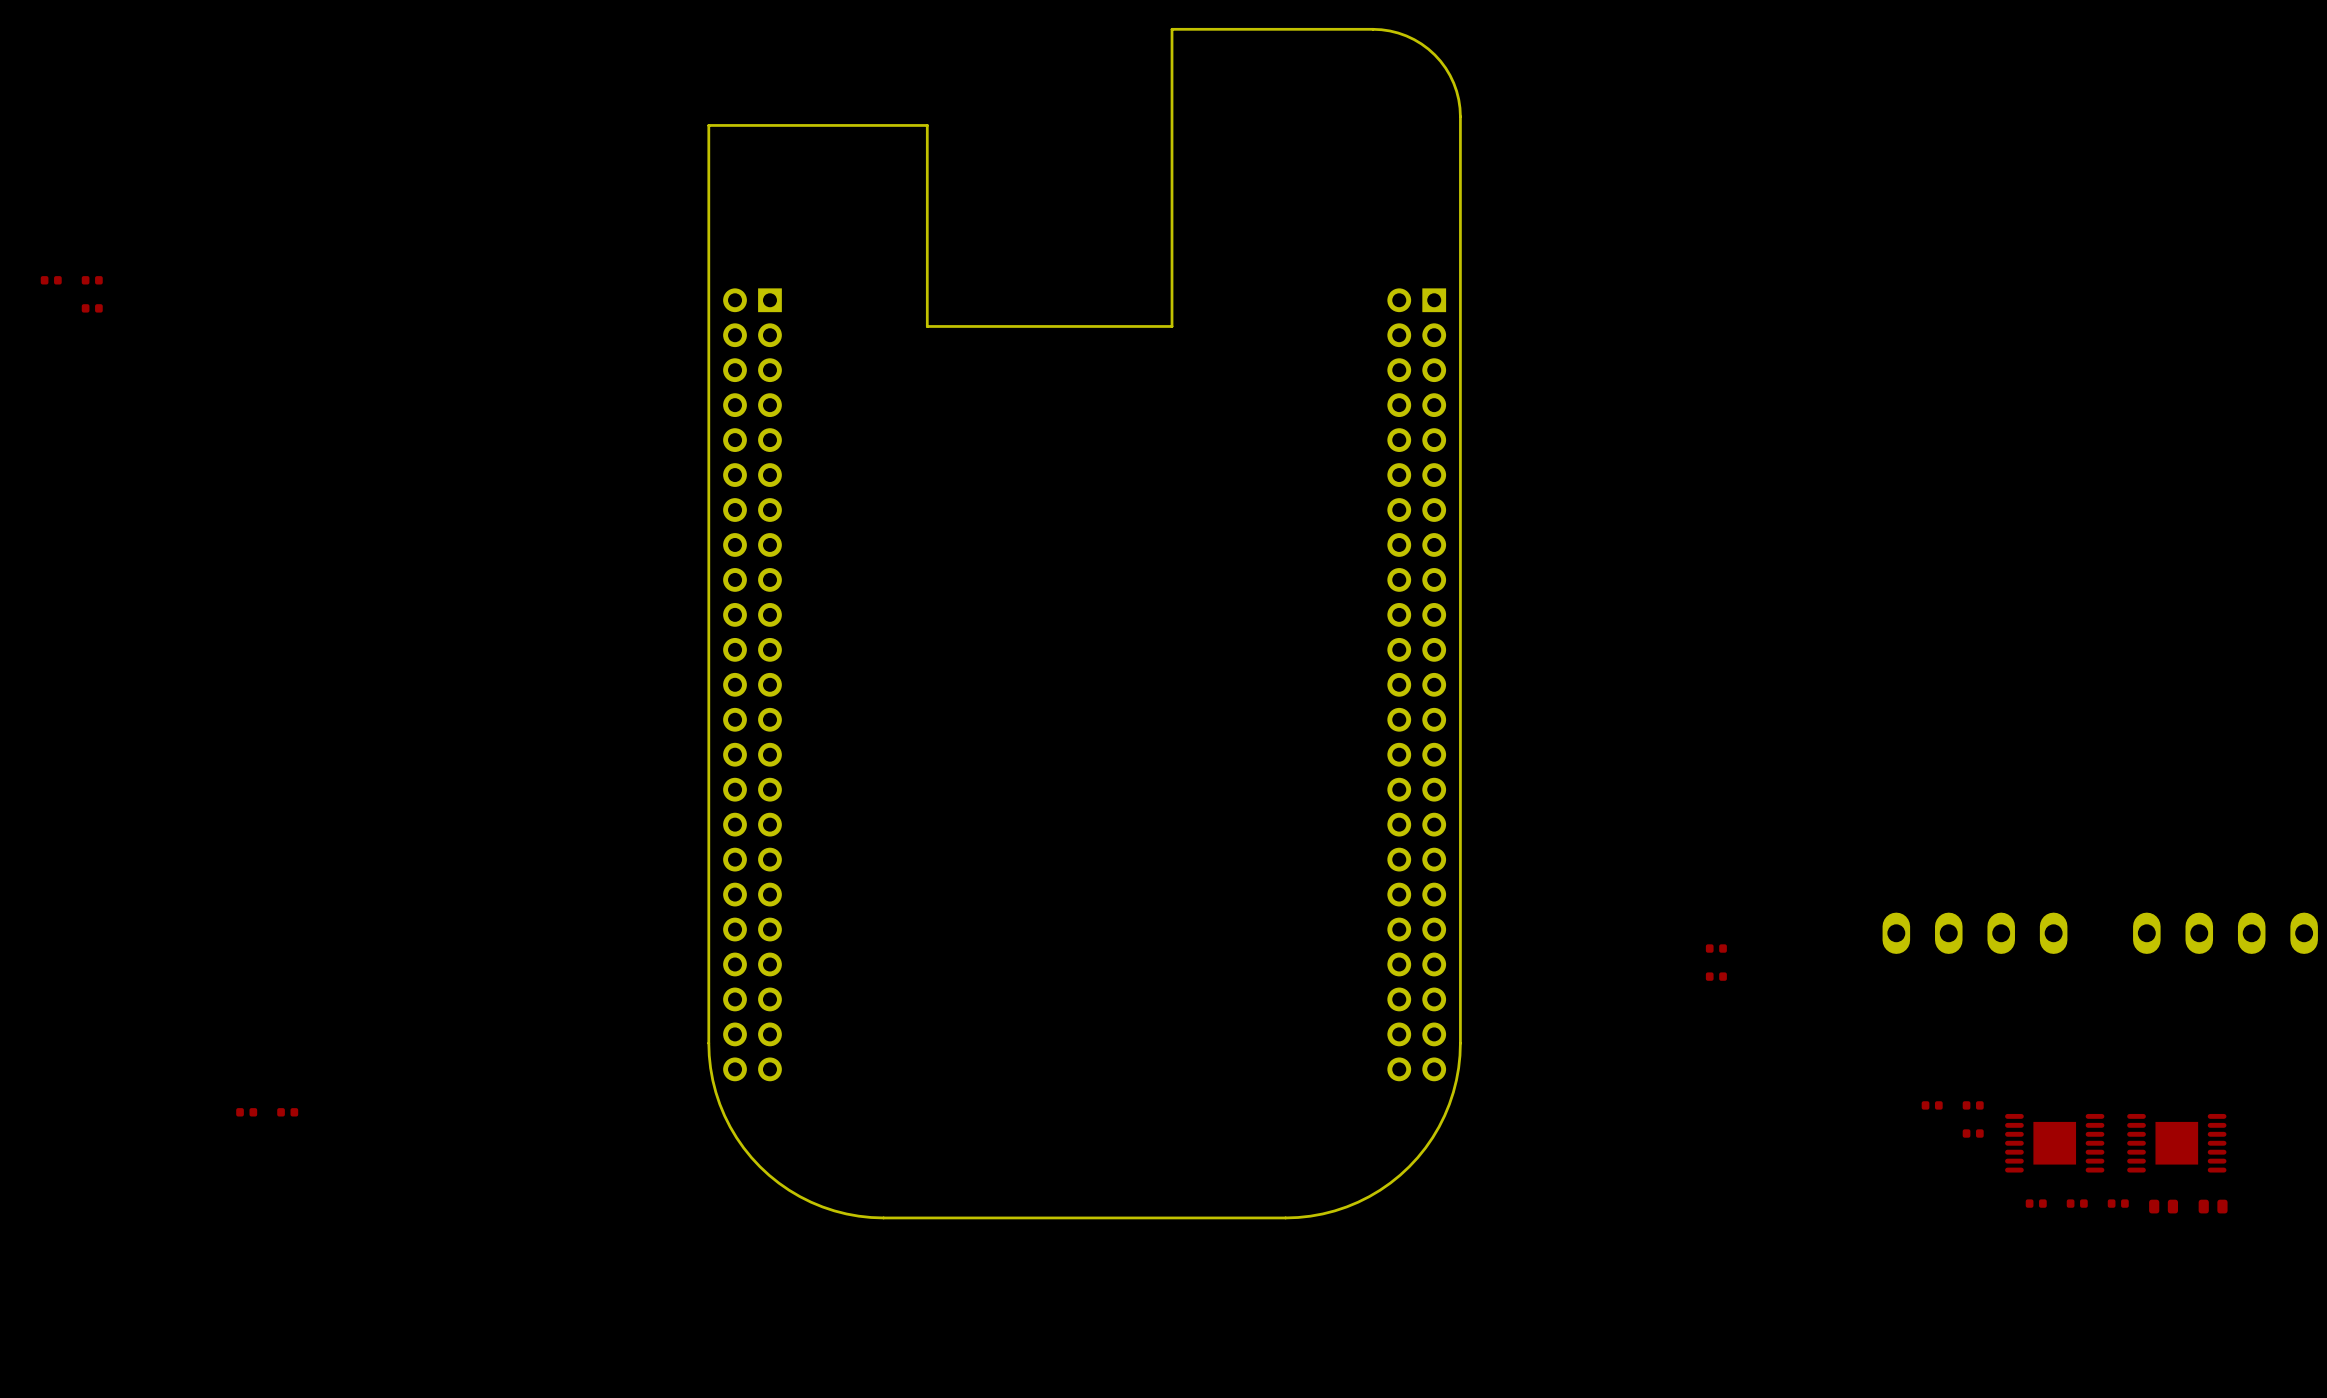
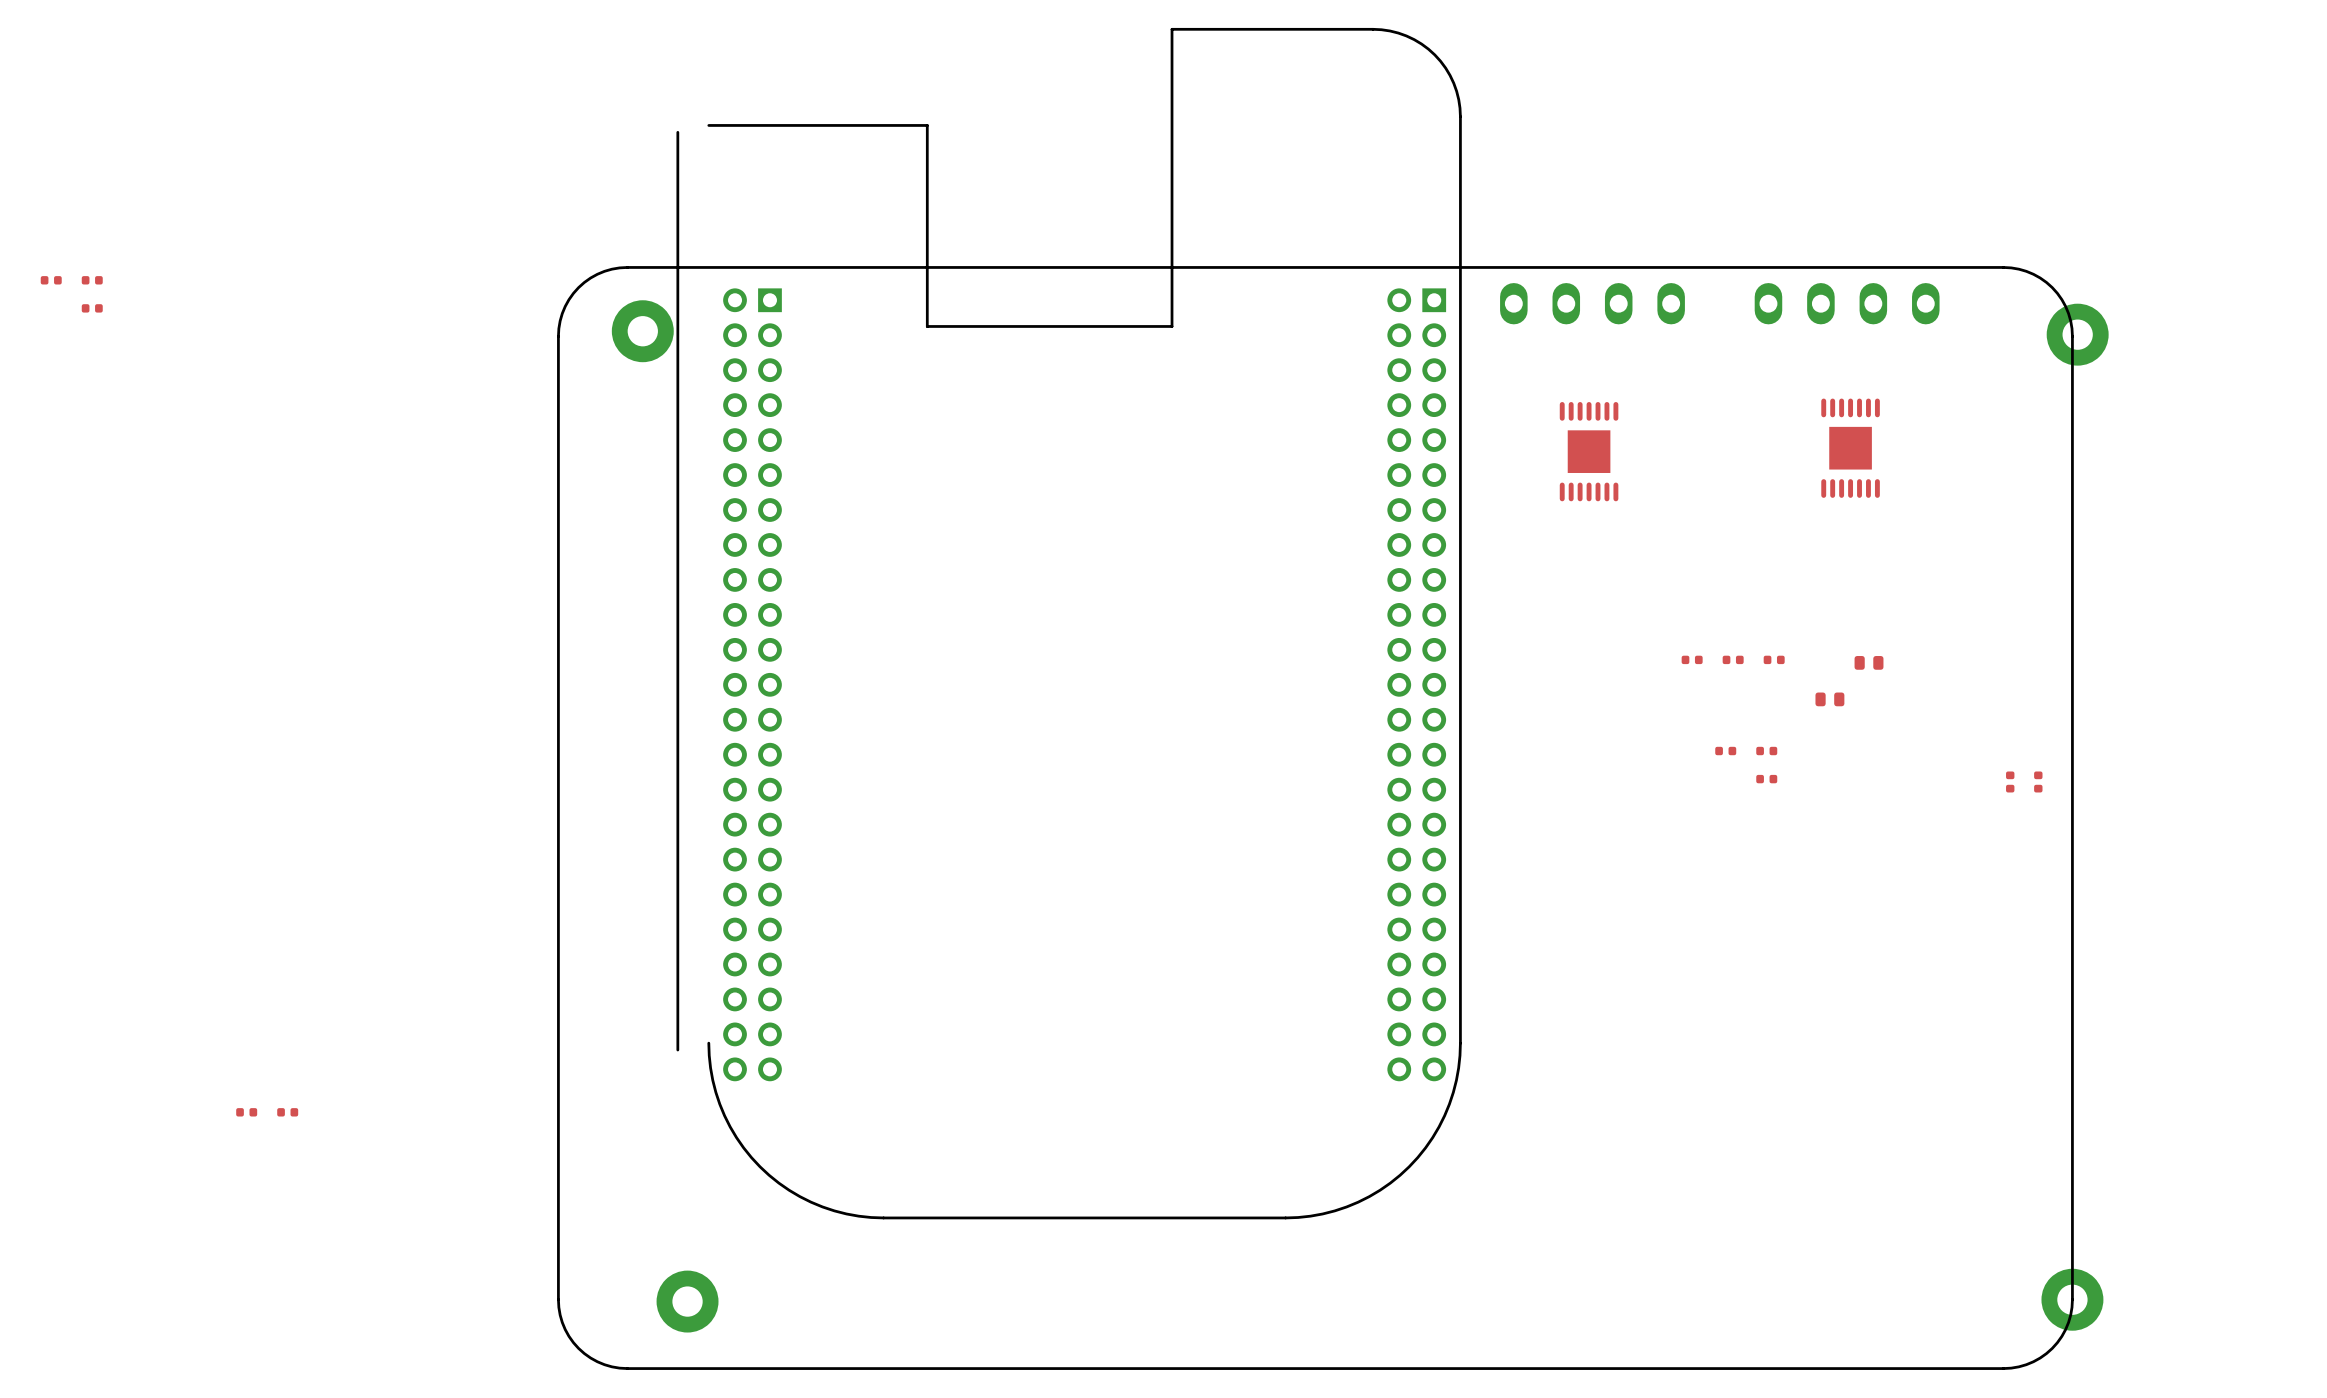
board edge: (708, 125) (708, 1043) -> (677, 132) (677, 1050)
board edge: none -> (2003, 267) (627, 267) (604, 271) (584, 282) (573, 293) (565, 306) (560, 320) (558, 336) (558, 1299) (562, 1322) (573, 1342) (584, 1353) (597, 1361) (611, 1366) (627, 1368) (2003, 1368) (2026, 1364) (2046, 1353) (2057, 1342) (2065, 1329) (2070, 1315) (2072, 1299) (2072, 336) (2068, 313) (2061, 299) (2052, 287) (2033, 274) (2018, 269) (2003, 267)
part: none -> (1592, 303)
part: none -> (1847, 303)
part: none -> (642, 331)
part: none -> (2077, 334)
part: none -> (1850, 448)
part: none -> (1589, 451)
part: none -> (1692, 659)
part: none -> (1733, 659)
part: none -> (1774, 659)
part: none -> (1869, 662)
part: none -> (1829, 699)
part: none -> (1725, 751)
part: none -> (1766, 751)
part: none -> (1766, 779)
part: none -> (2010, 781)
part: none -> (2038, 781)
part: (1974, 933) -> none
part: (2225, 933) -> none
part: (1716, 948) -> none
part: (1716, 976) -> none
part: (1932, 1105) -> none
part: (1973, 1105) -> none
part: (1973, 1133) -> none
part: (2054, 1143) -> none
part: (2176, 1143) -> none
part: (2036, 1203) -> none
part: (2077, 1203) -> none
part: (2118, 1203) -> none
part: (2163, 1206) -> none
part: (2213, 1206) -> none
part: none -> (2072, 1299)
part: none -> (687, 1301)

